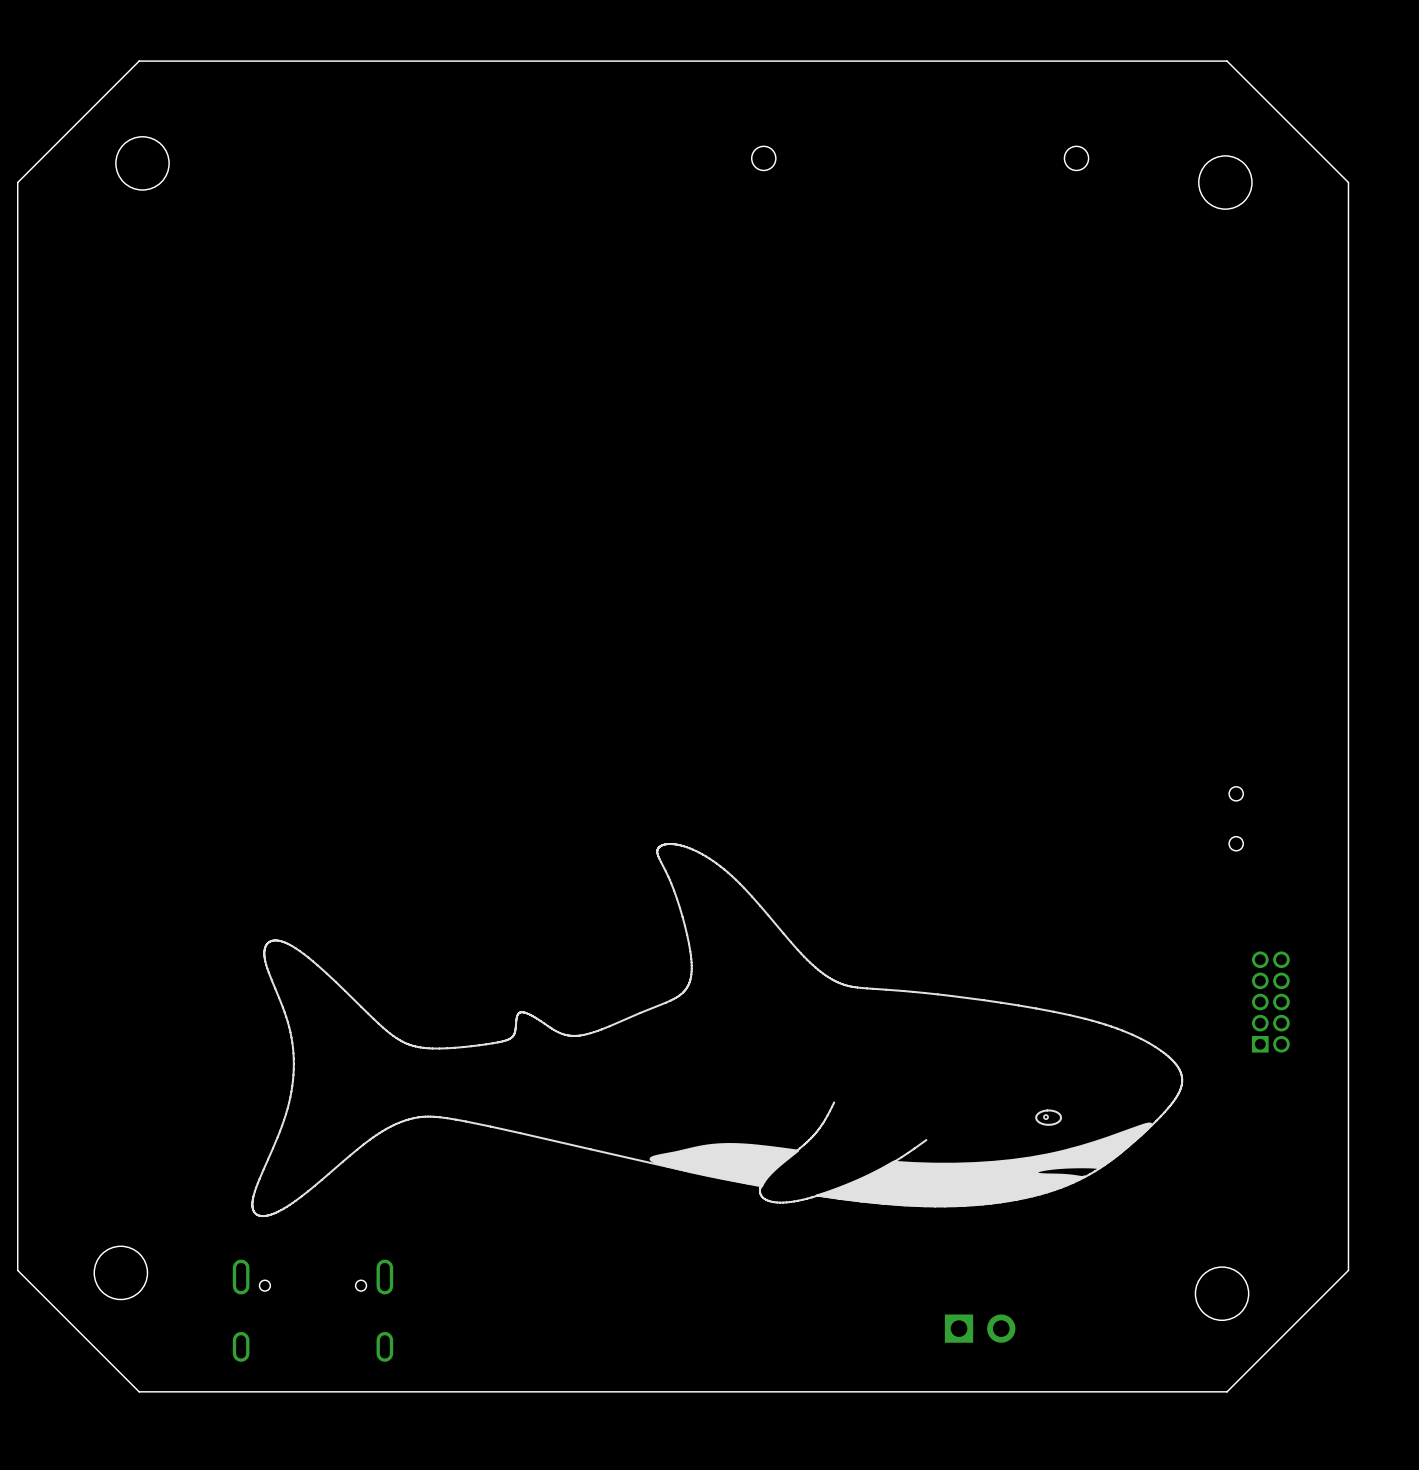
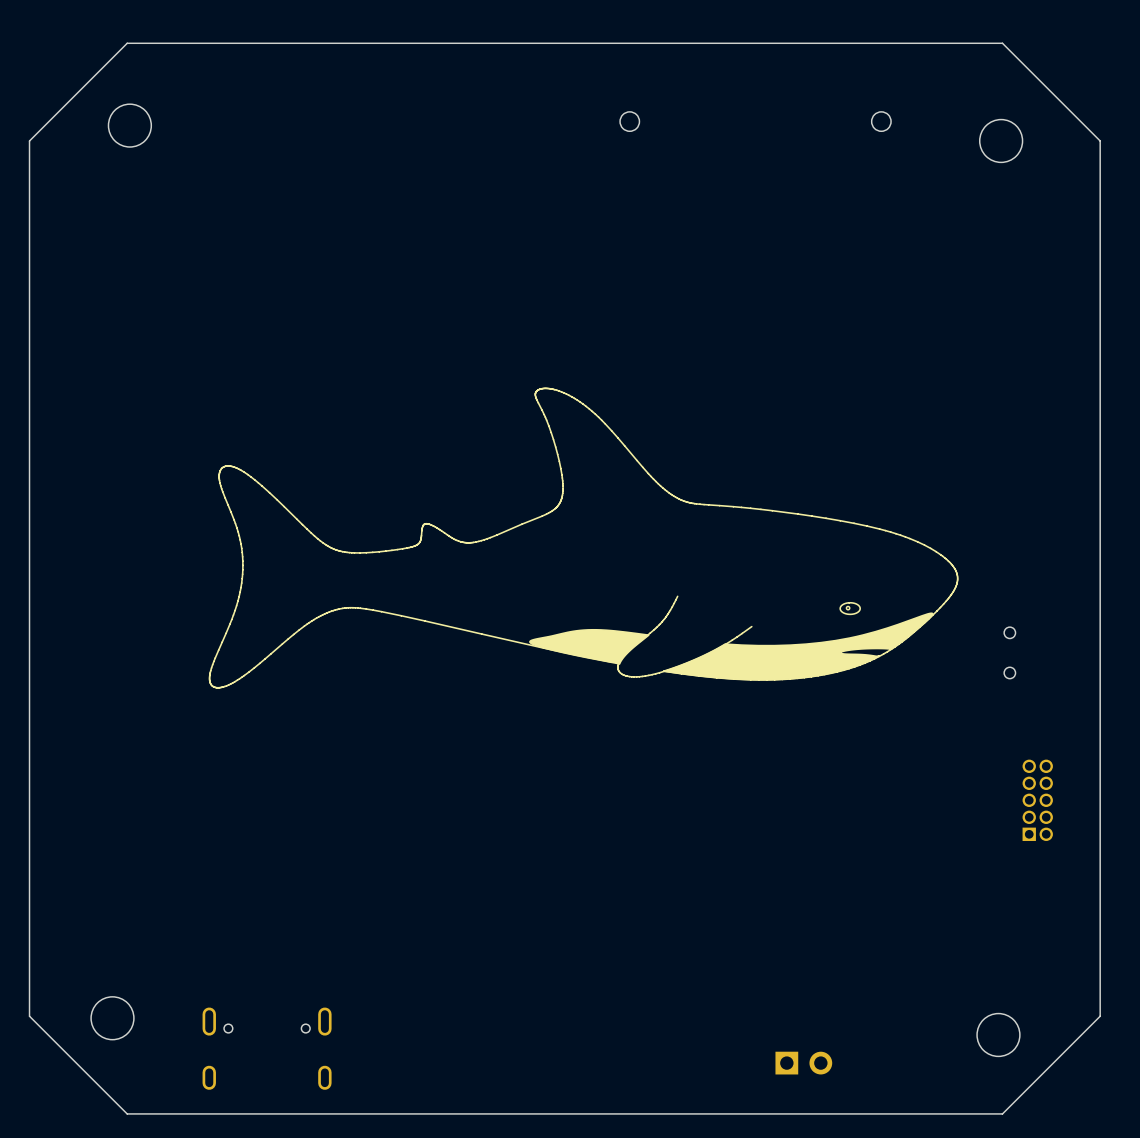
drawing: none -> [208, 387, 959, 689]
drawing: [251, 842, 1184, 1218] -> none

